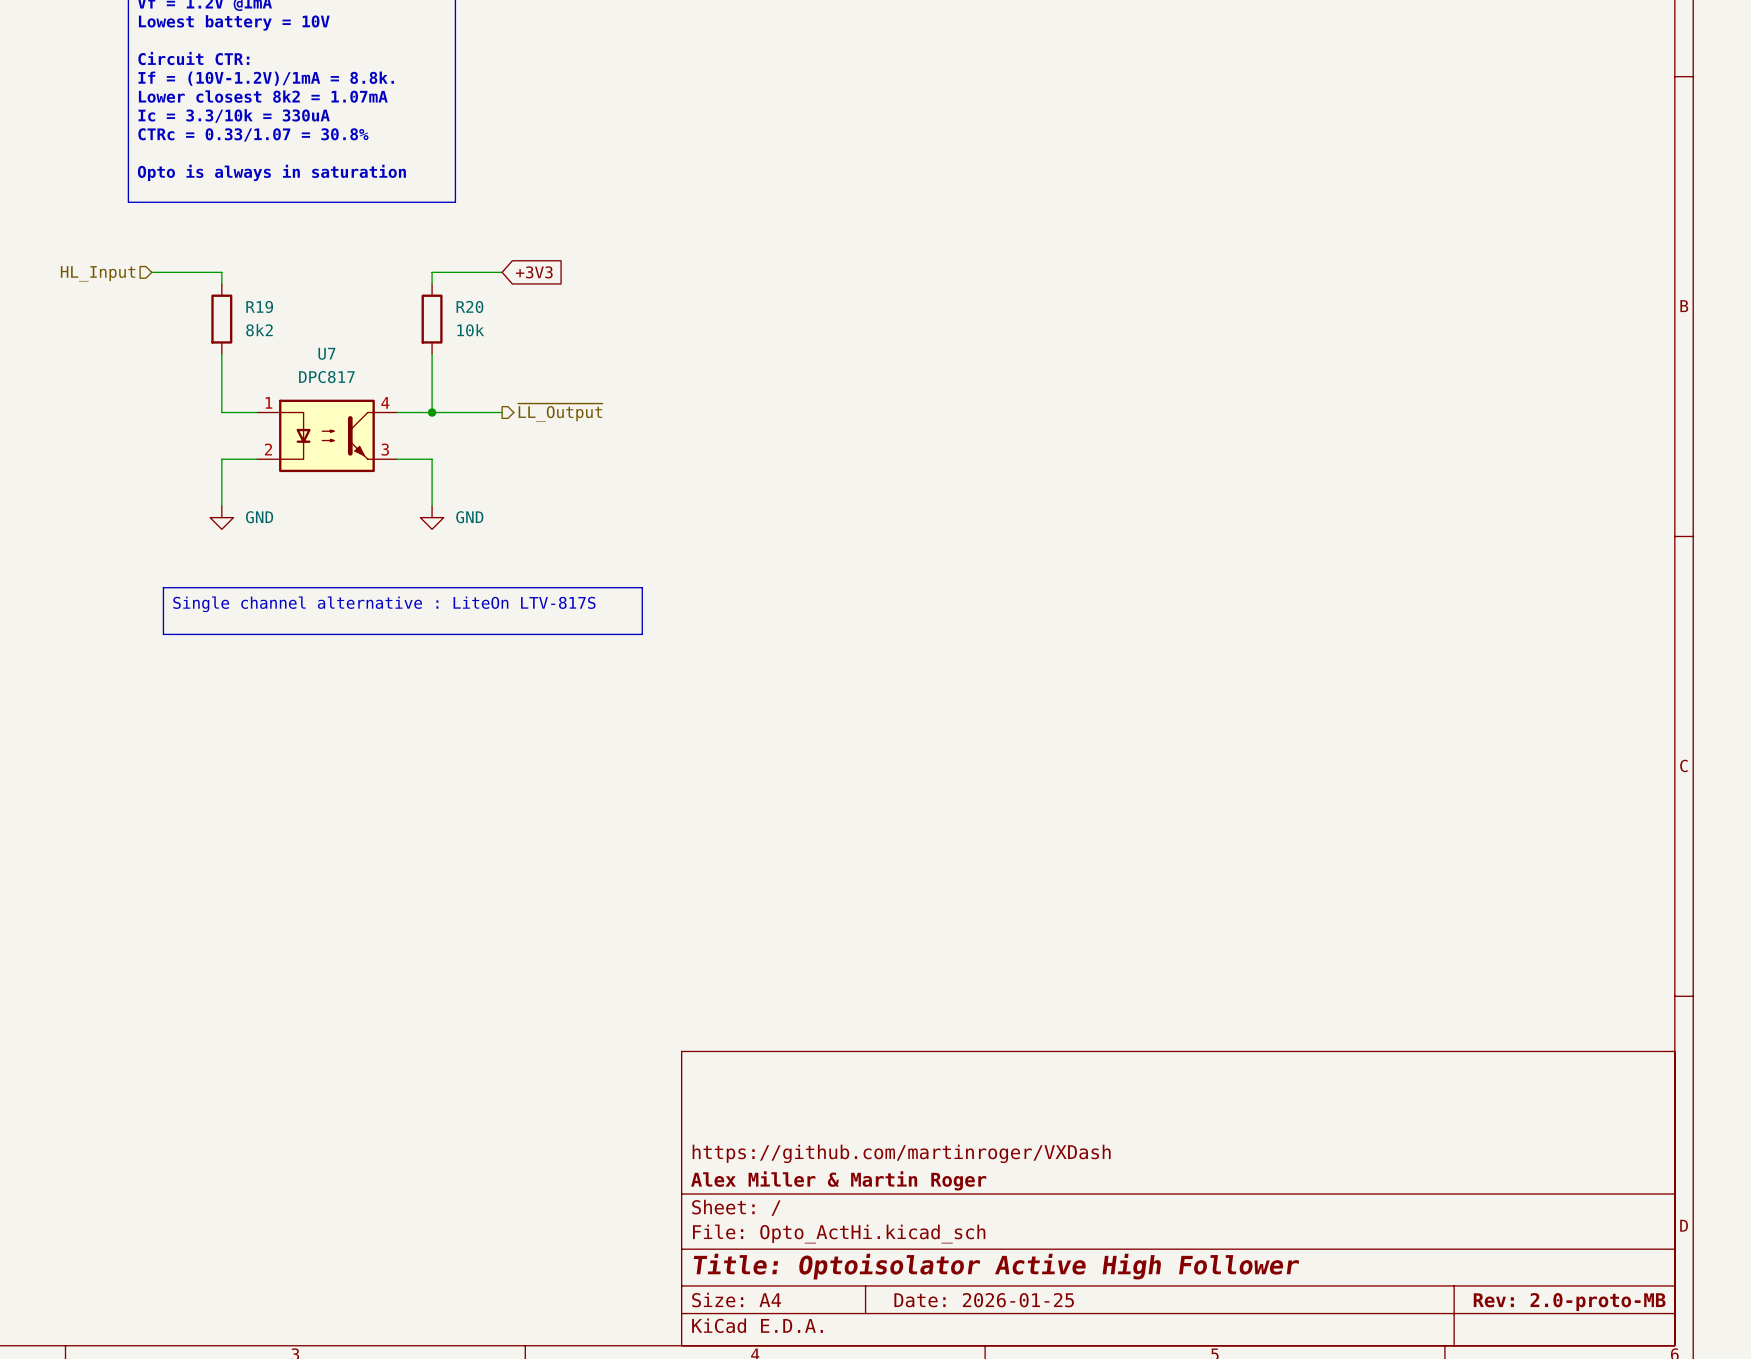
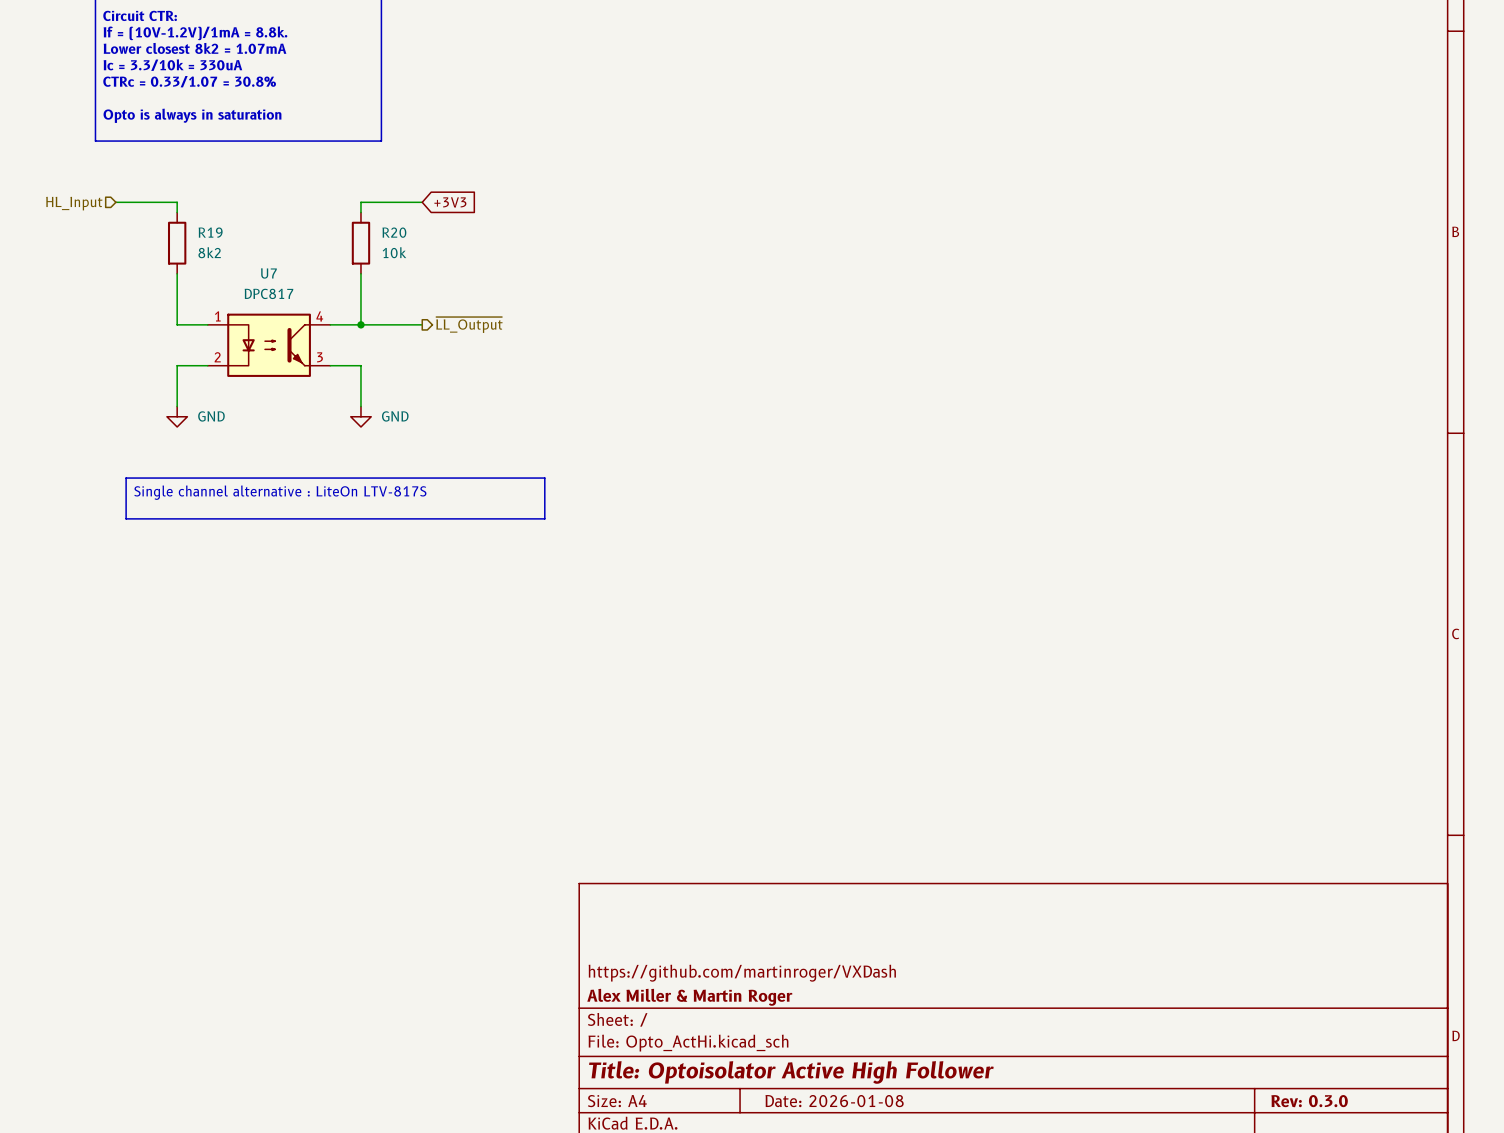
title block: Date: 2026-01-25 (984, 1300) -> Date: 2026-01-08 (834, 1101)
title block: Rev: 2.0-proto-MB (1569, 1302) -> Rev: 0.3.0 (1309, 1101)

